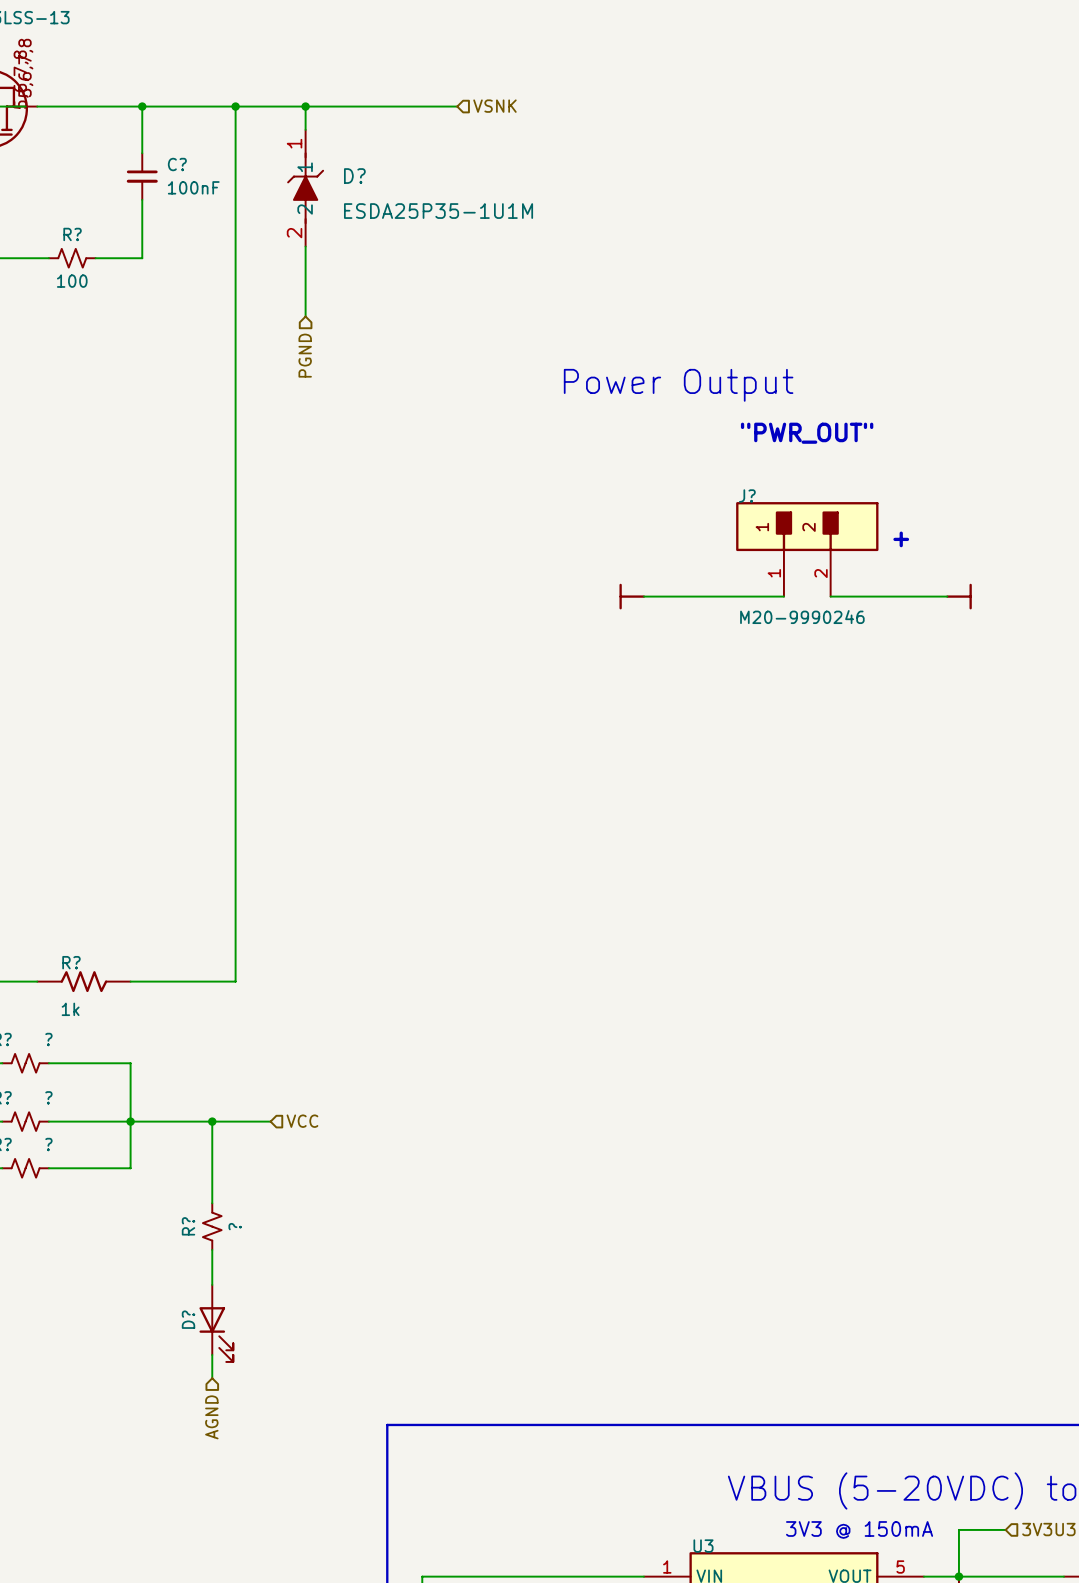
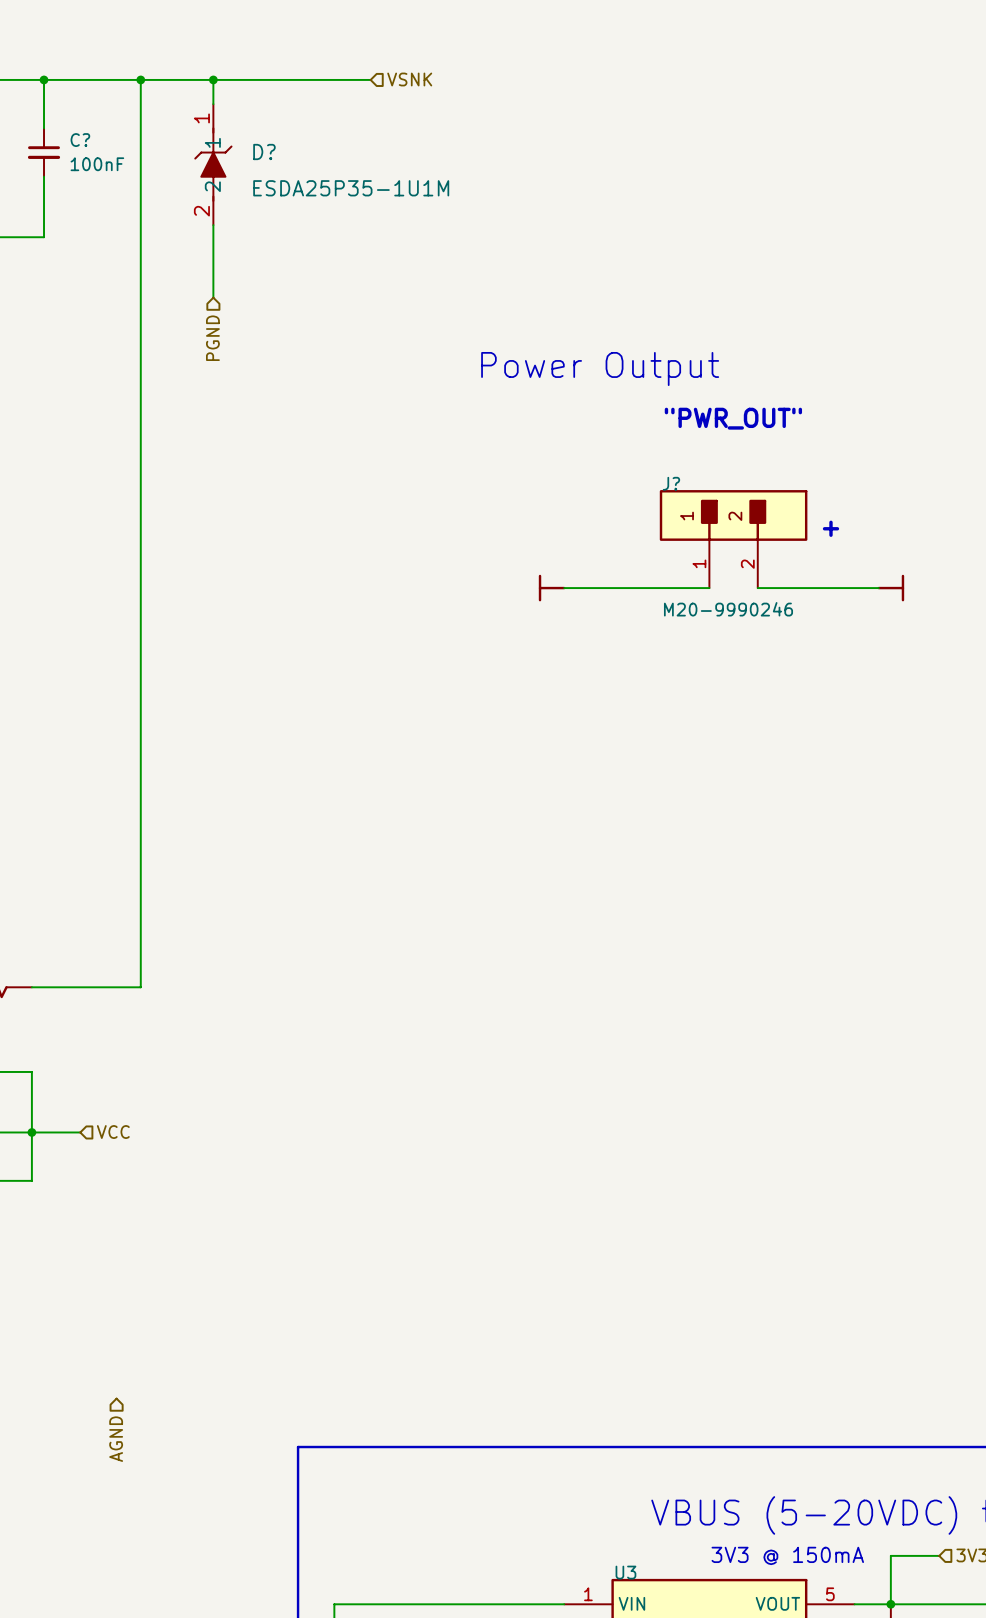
wire: (177, 1121) (270, 1121) -> none
wire: (212, 1121) (212, 1203) -> none
junction: (212, 1121) -> none
hierarchical label position: VCC (302, 1121) -> VCC (113, 1132)
R?: ? (212, 1226) -> none
wire: (212, 1249) (212, 1284) -> none
D?: (216, 1323) -> none
wire: (212, 1354) (212, 1378) -> none

